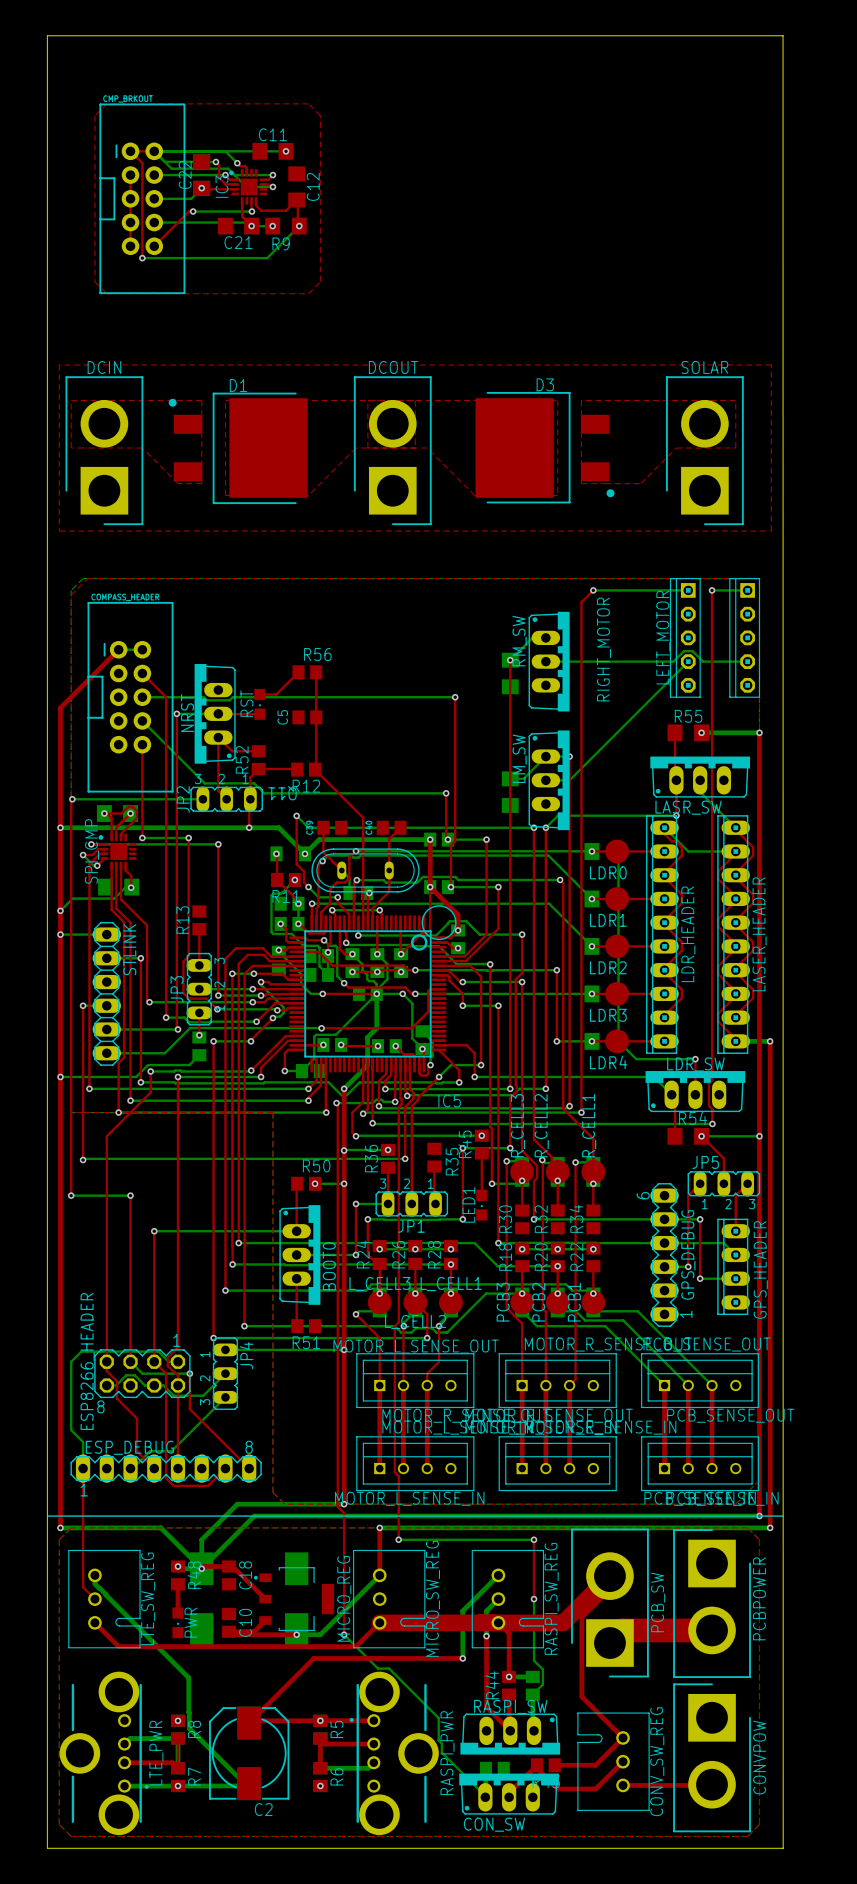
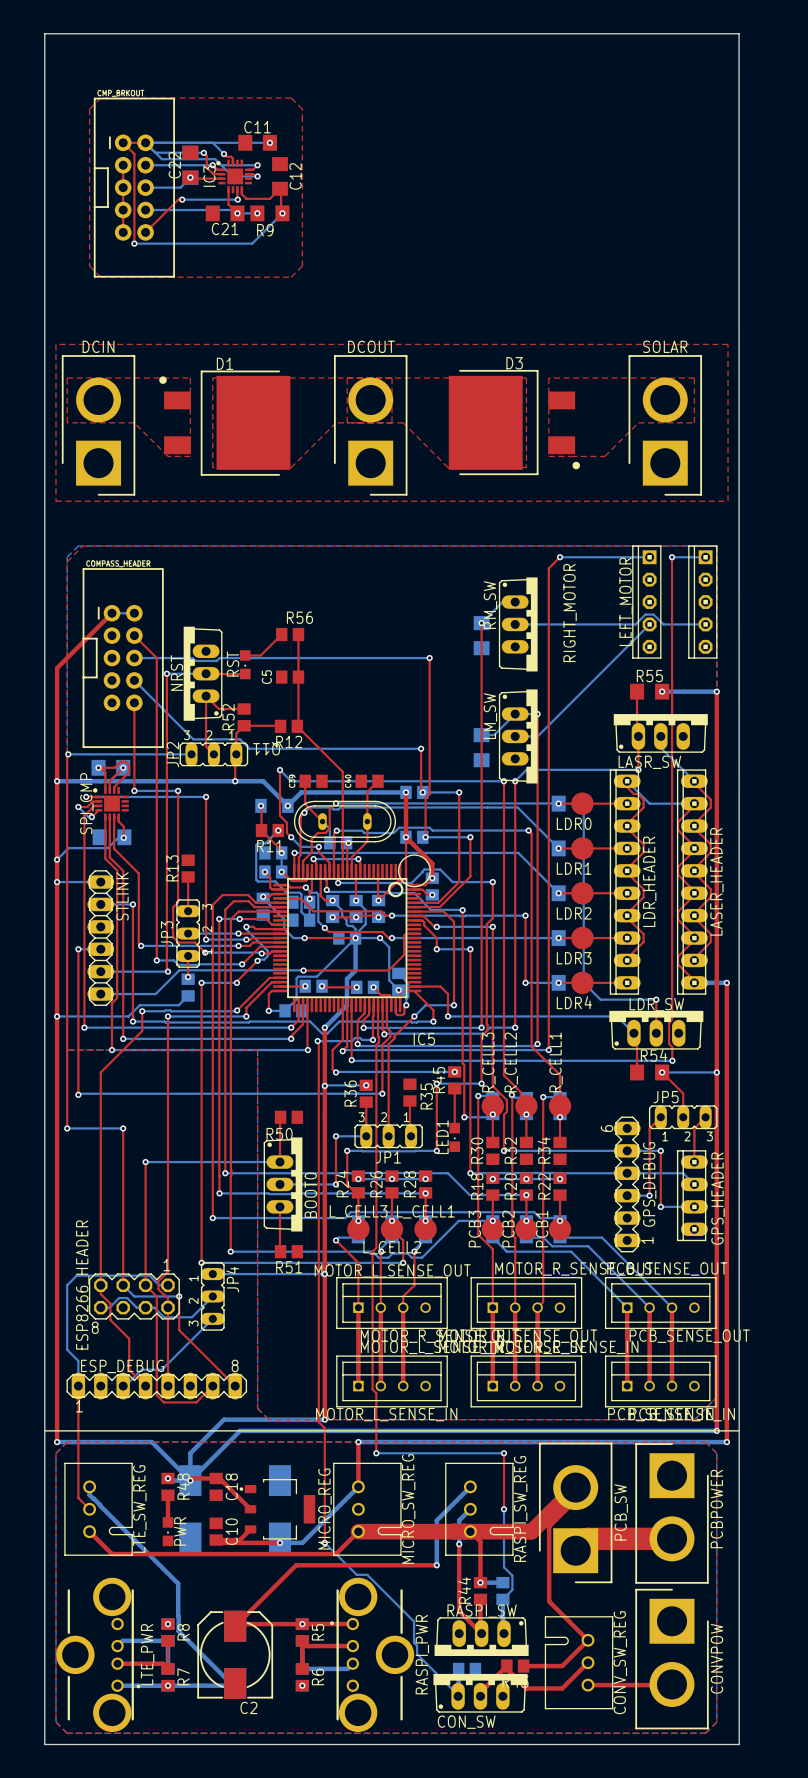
R50 name position: R50 (316, 1165) -> R50 (279, 1134)
bottom track: (315, 1183) (344, 1183) -> none
via: (315, 1183) -> none
via: (344, 1183) -> none

